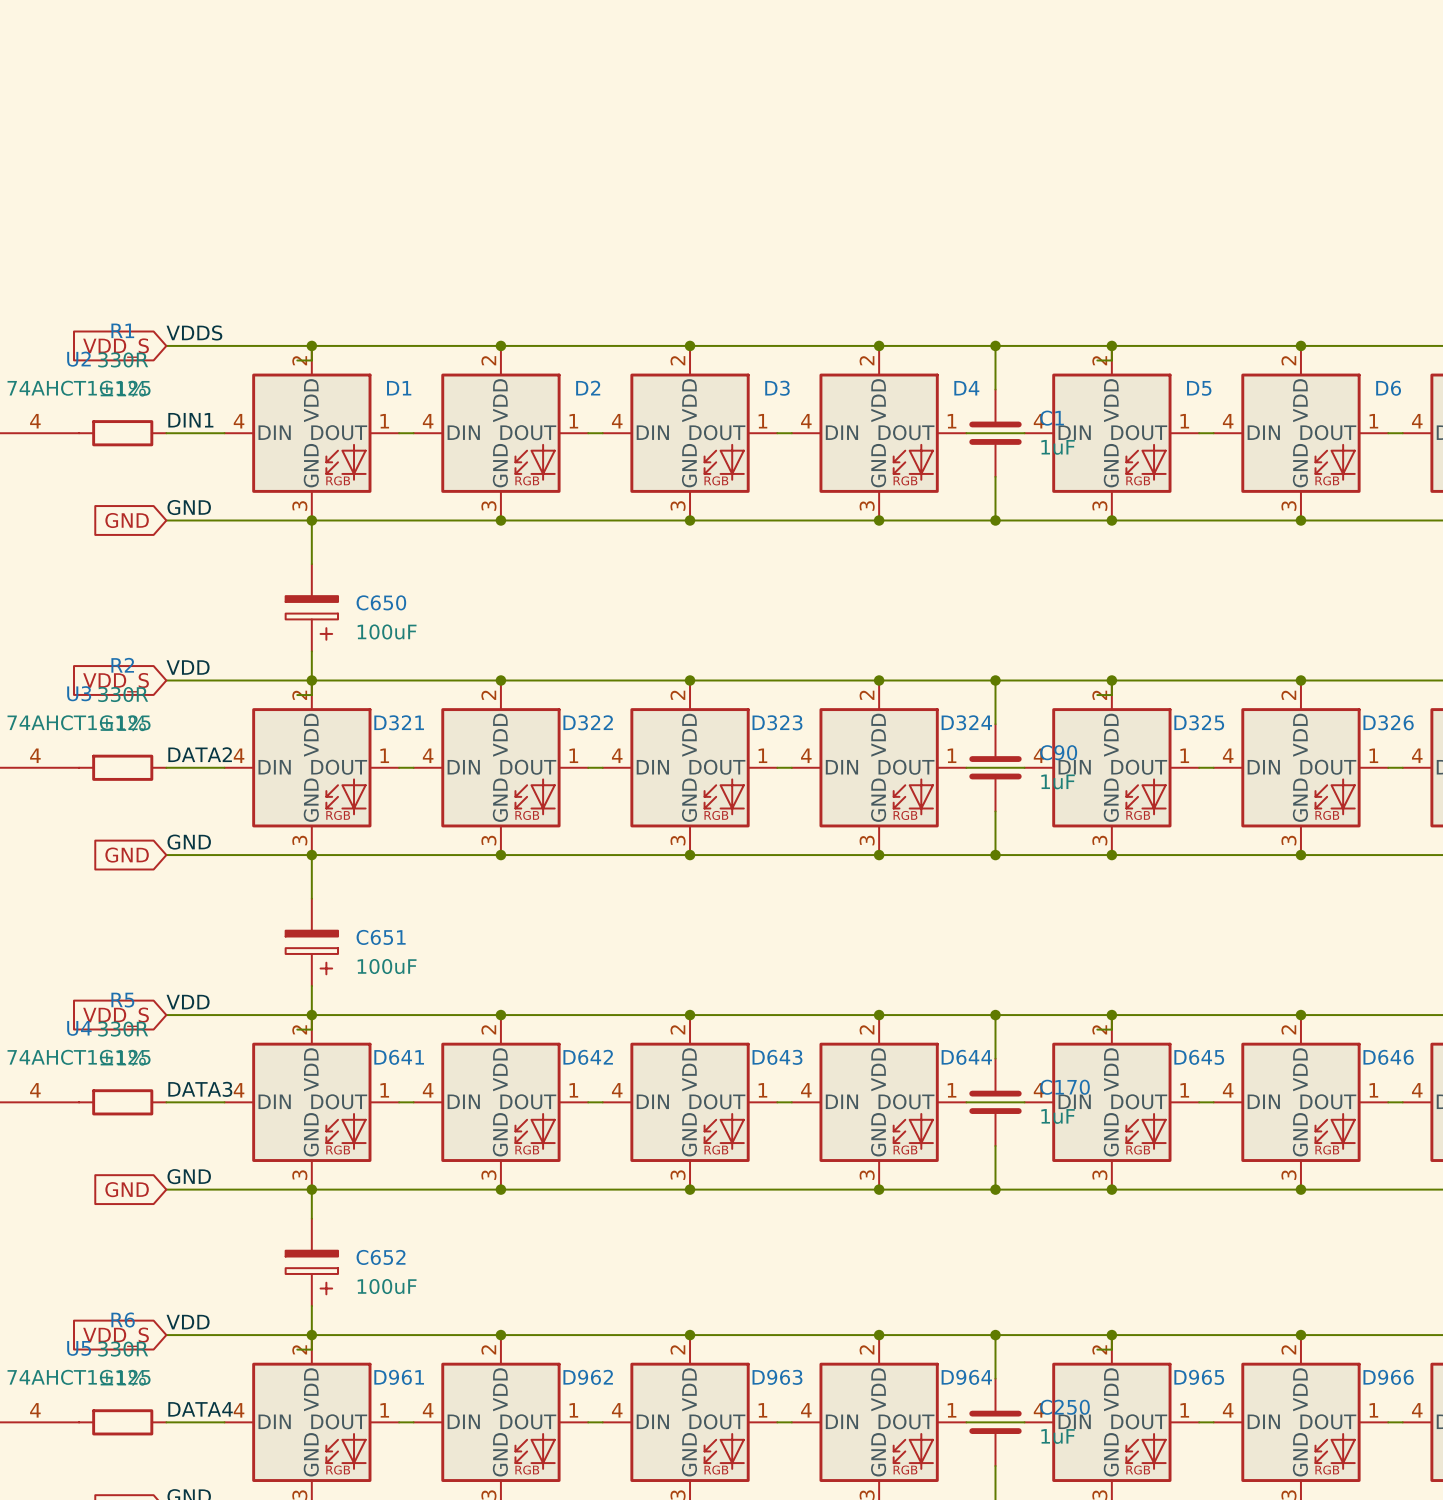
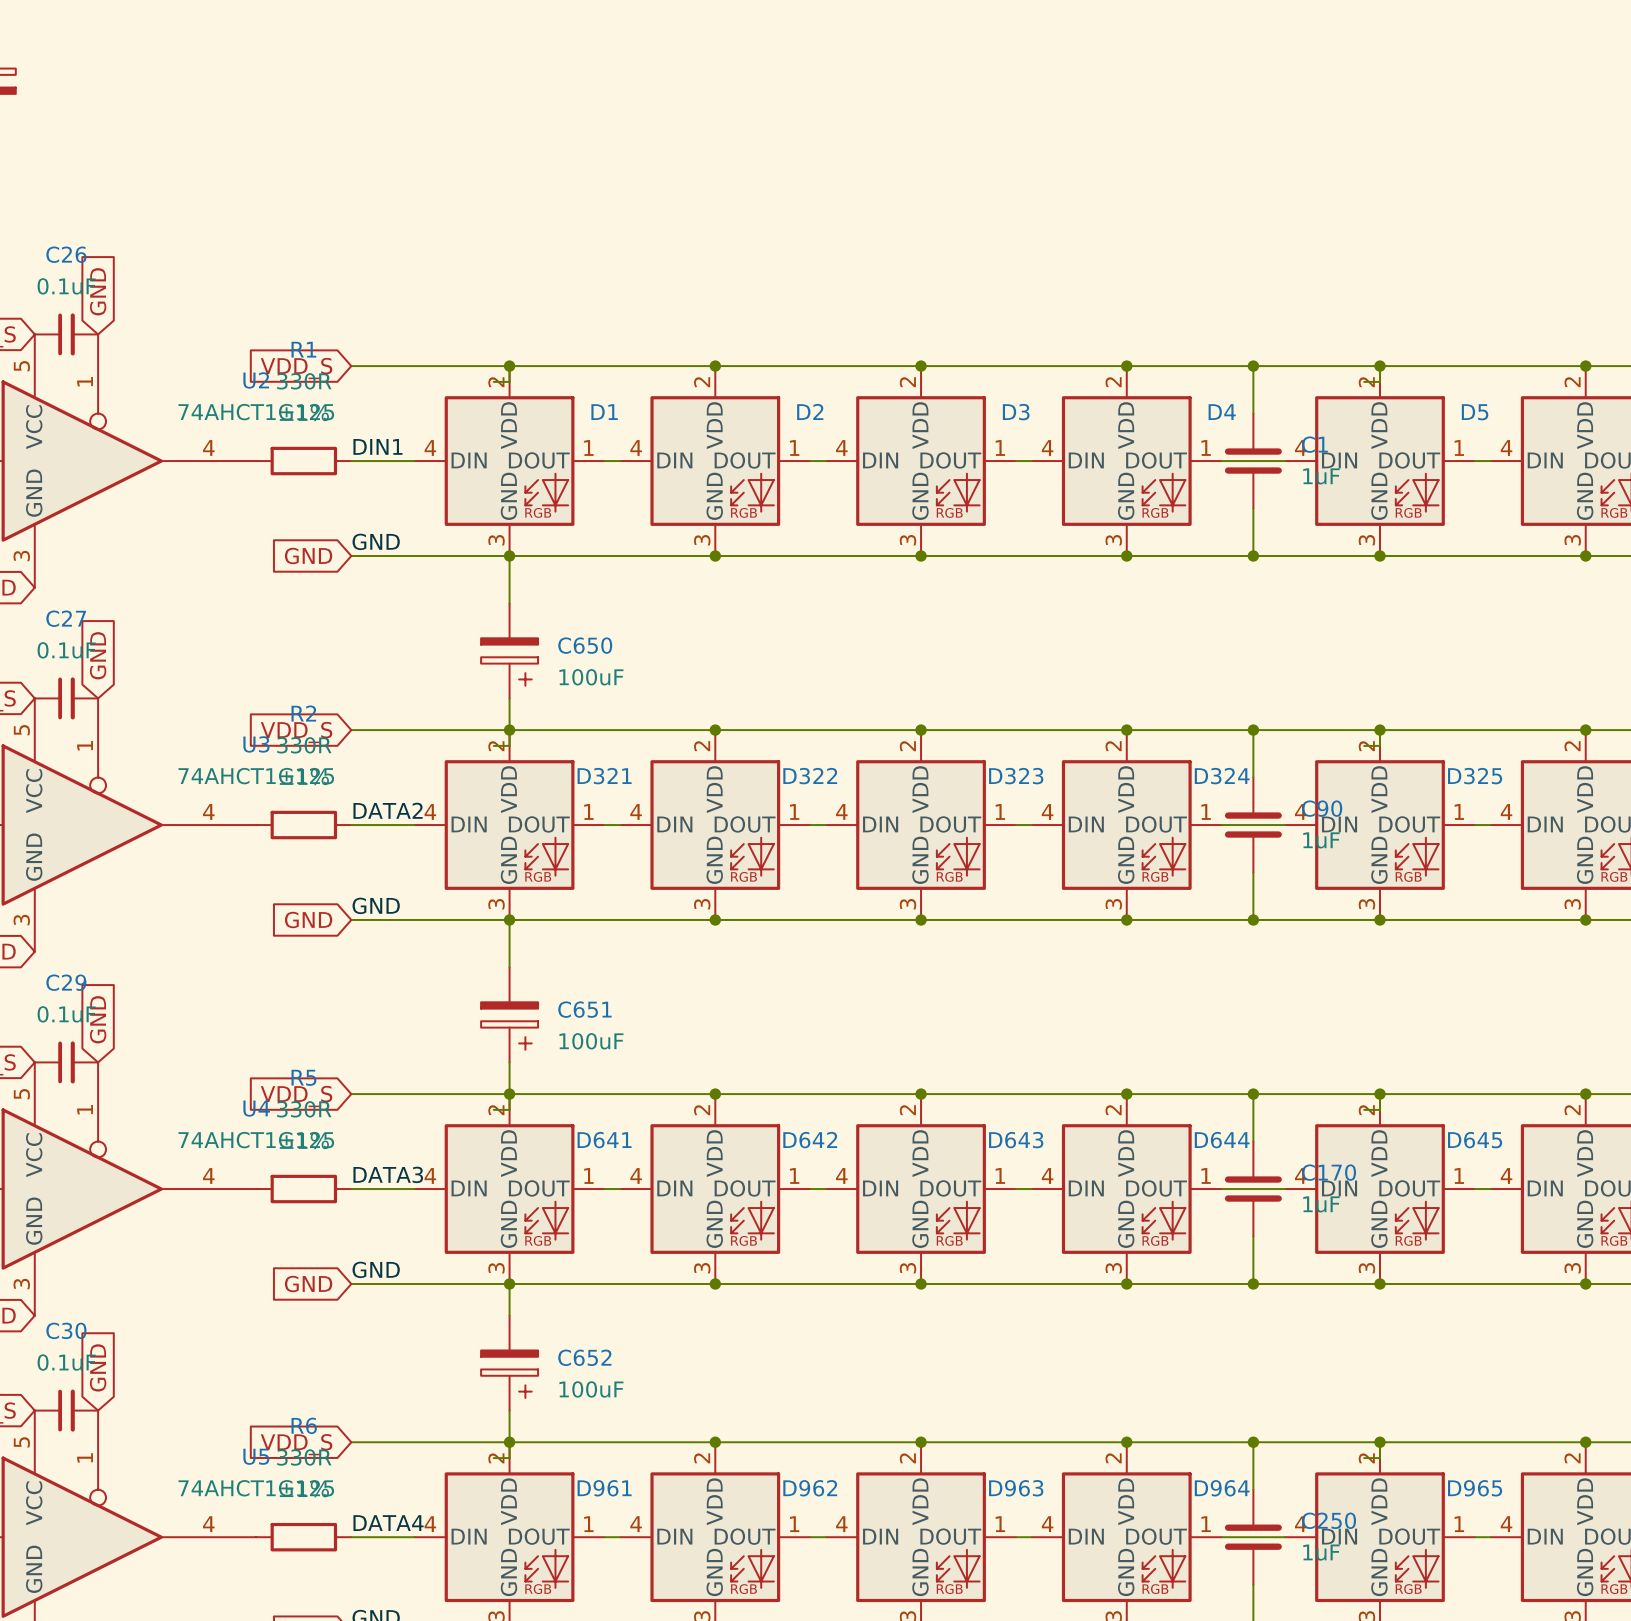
label: VDDS (194, 332) -> none
label: VDD (188, 667) -> none
label: VDD (188, 1002) -> none
label: VDD (188, 1322) -> none

